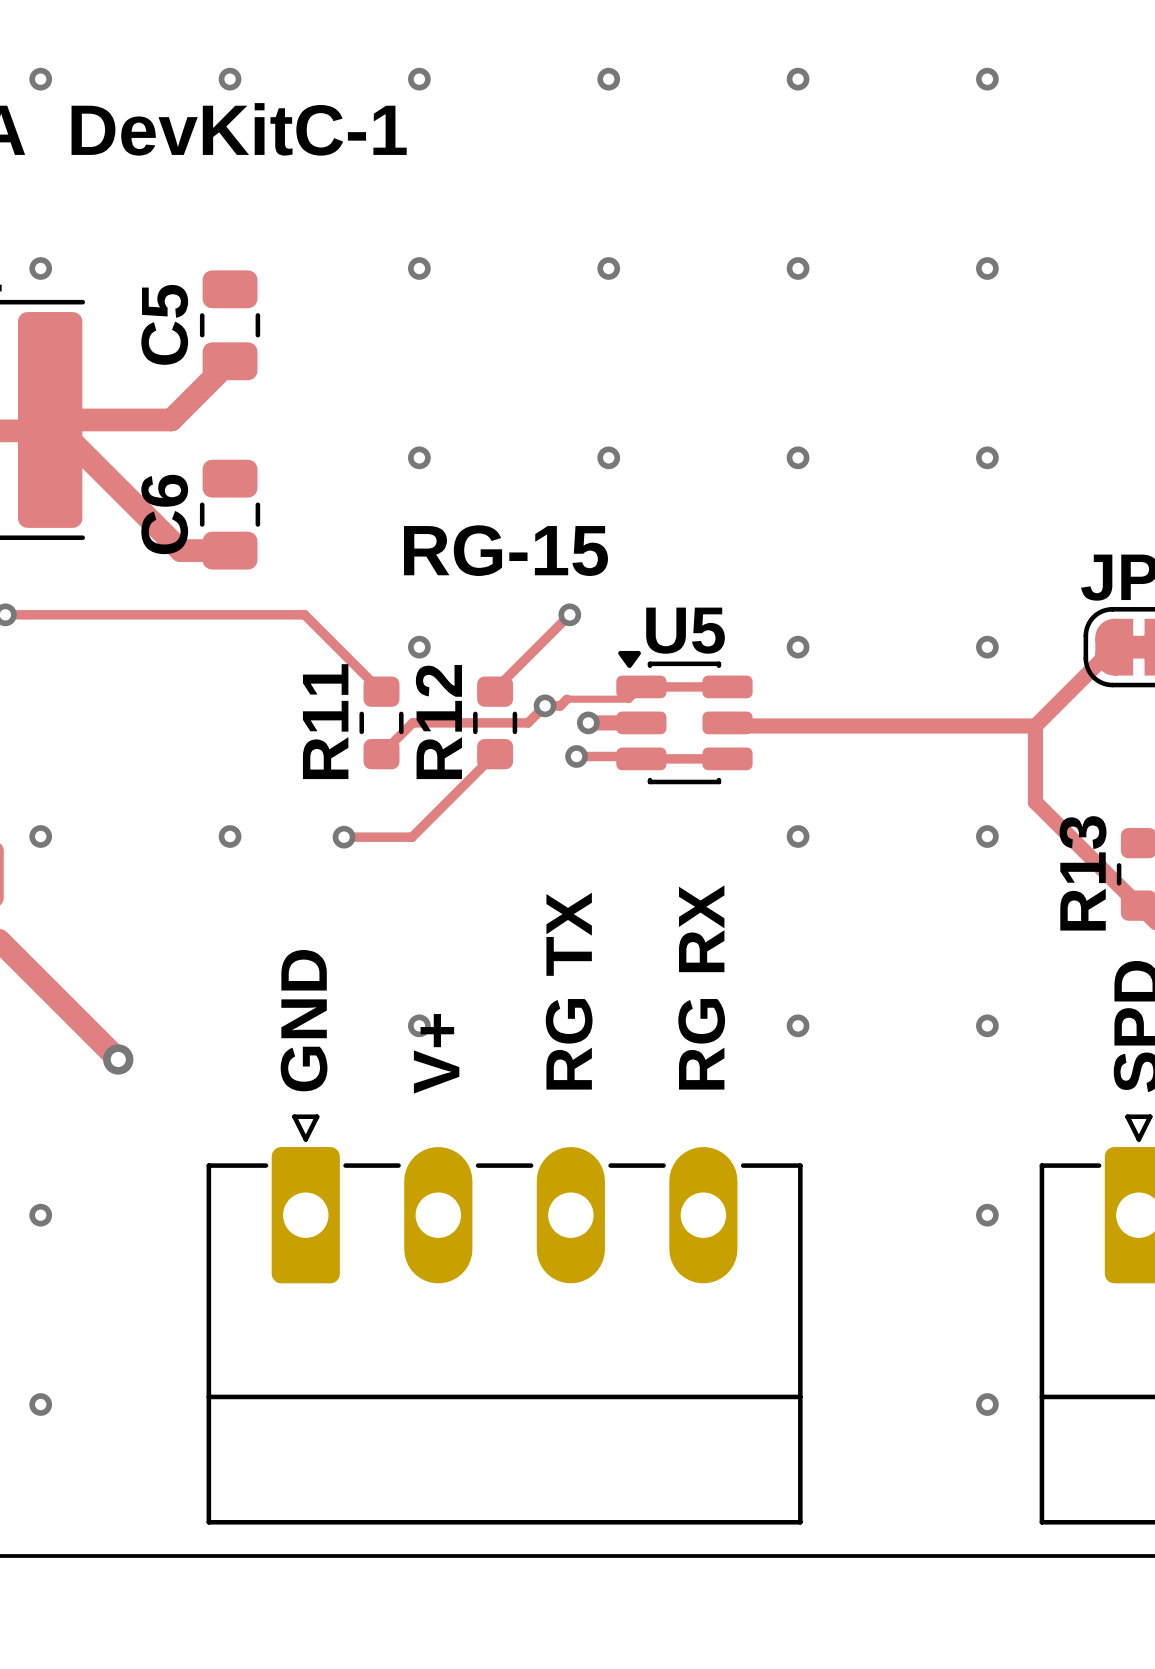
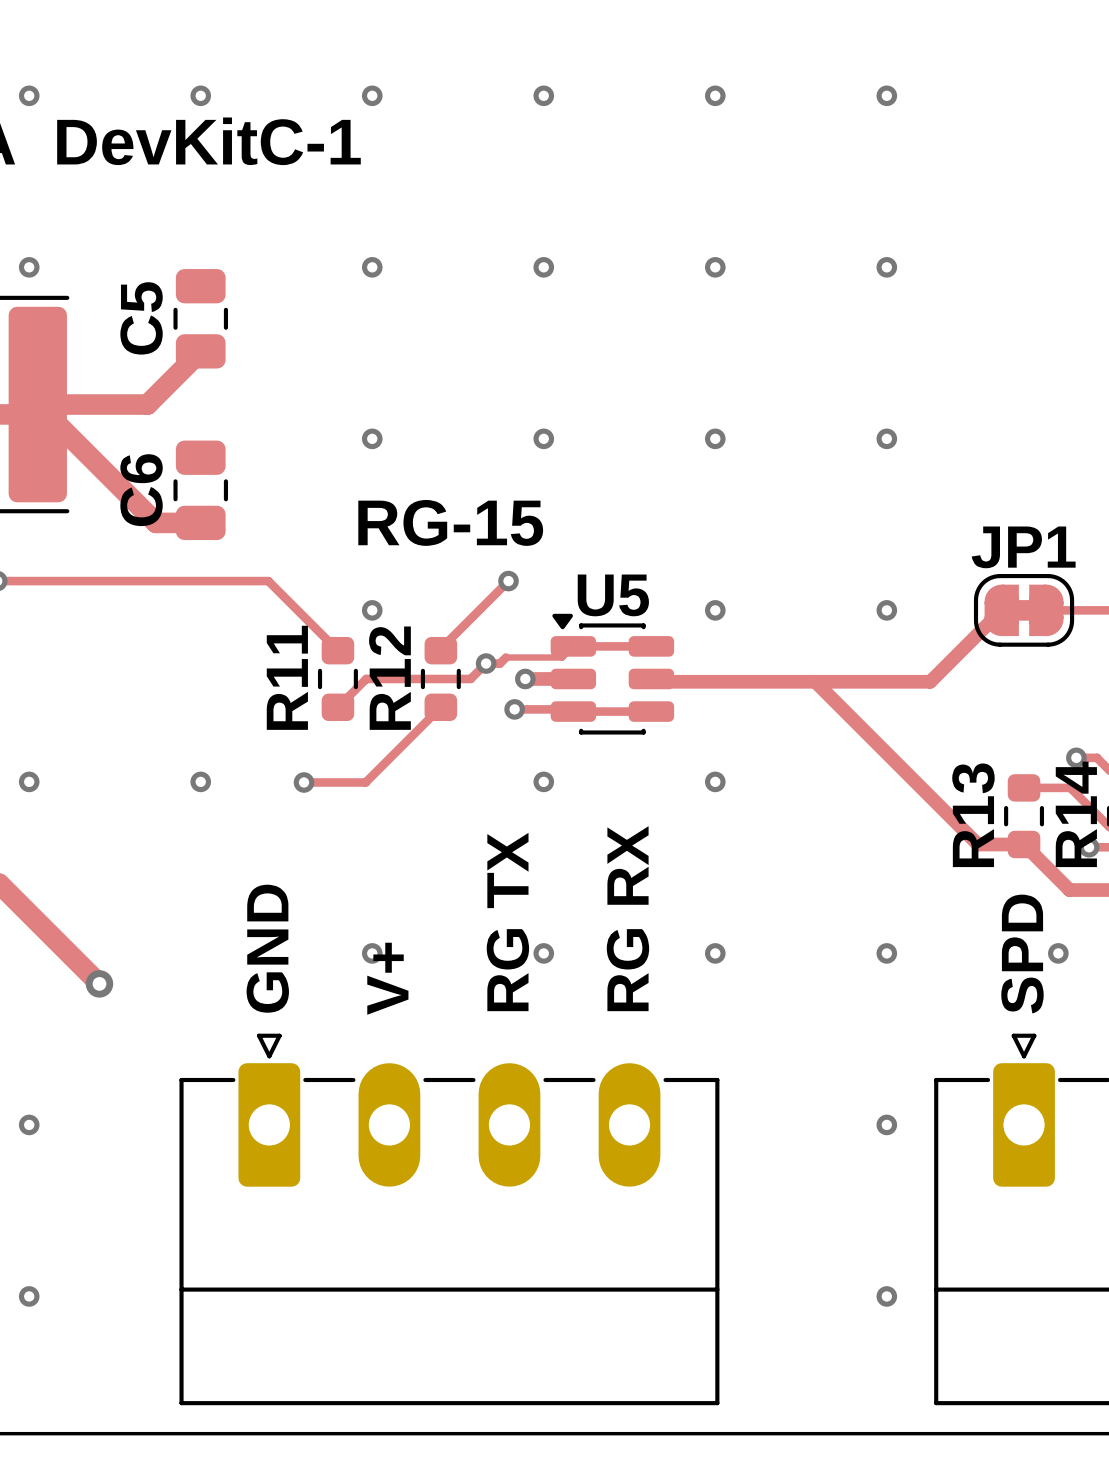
track: (1035, 725) (1035, 802) (1138, 905) -> (815, 681) (978, 844) (1024, 844)
via: none -> (543, 781)
via: (987, 836) -> none
via: none -> (543, 953)

